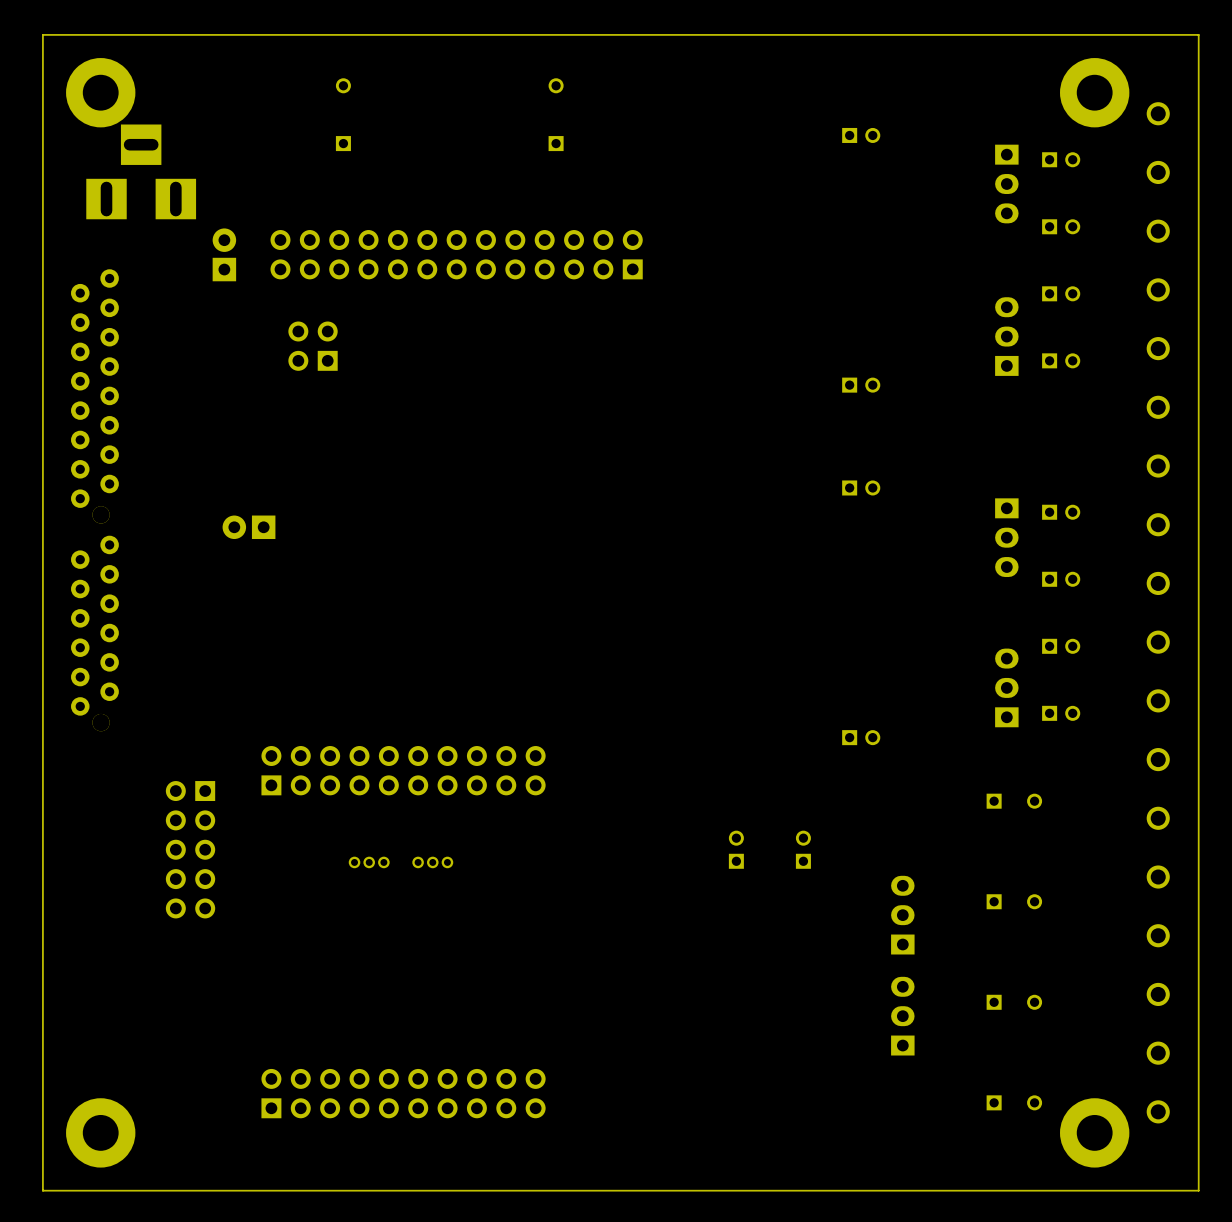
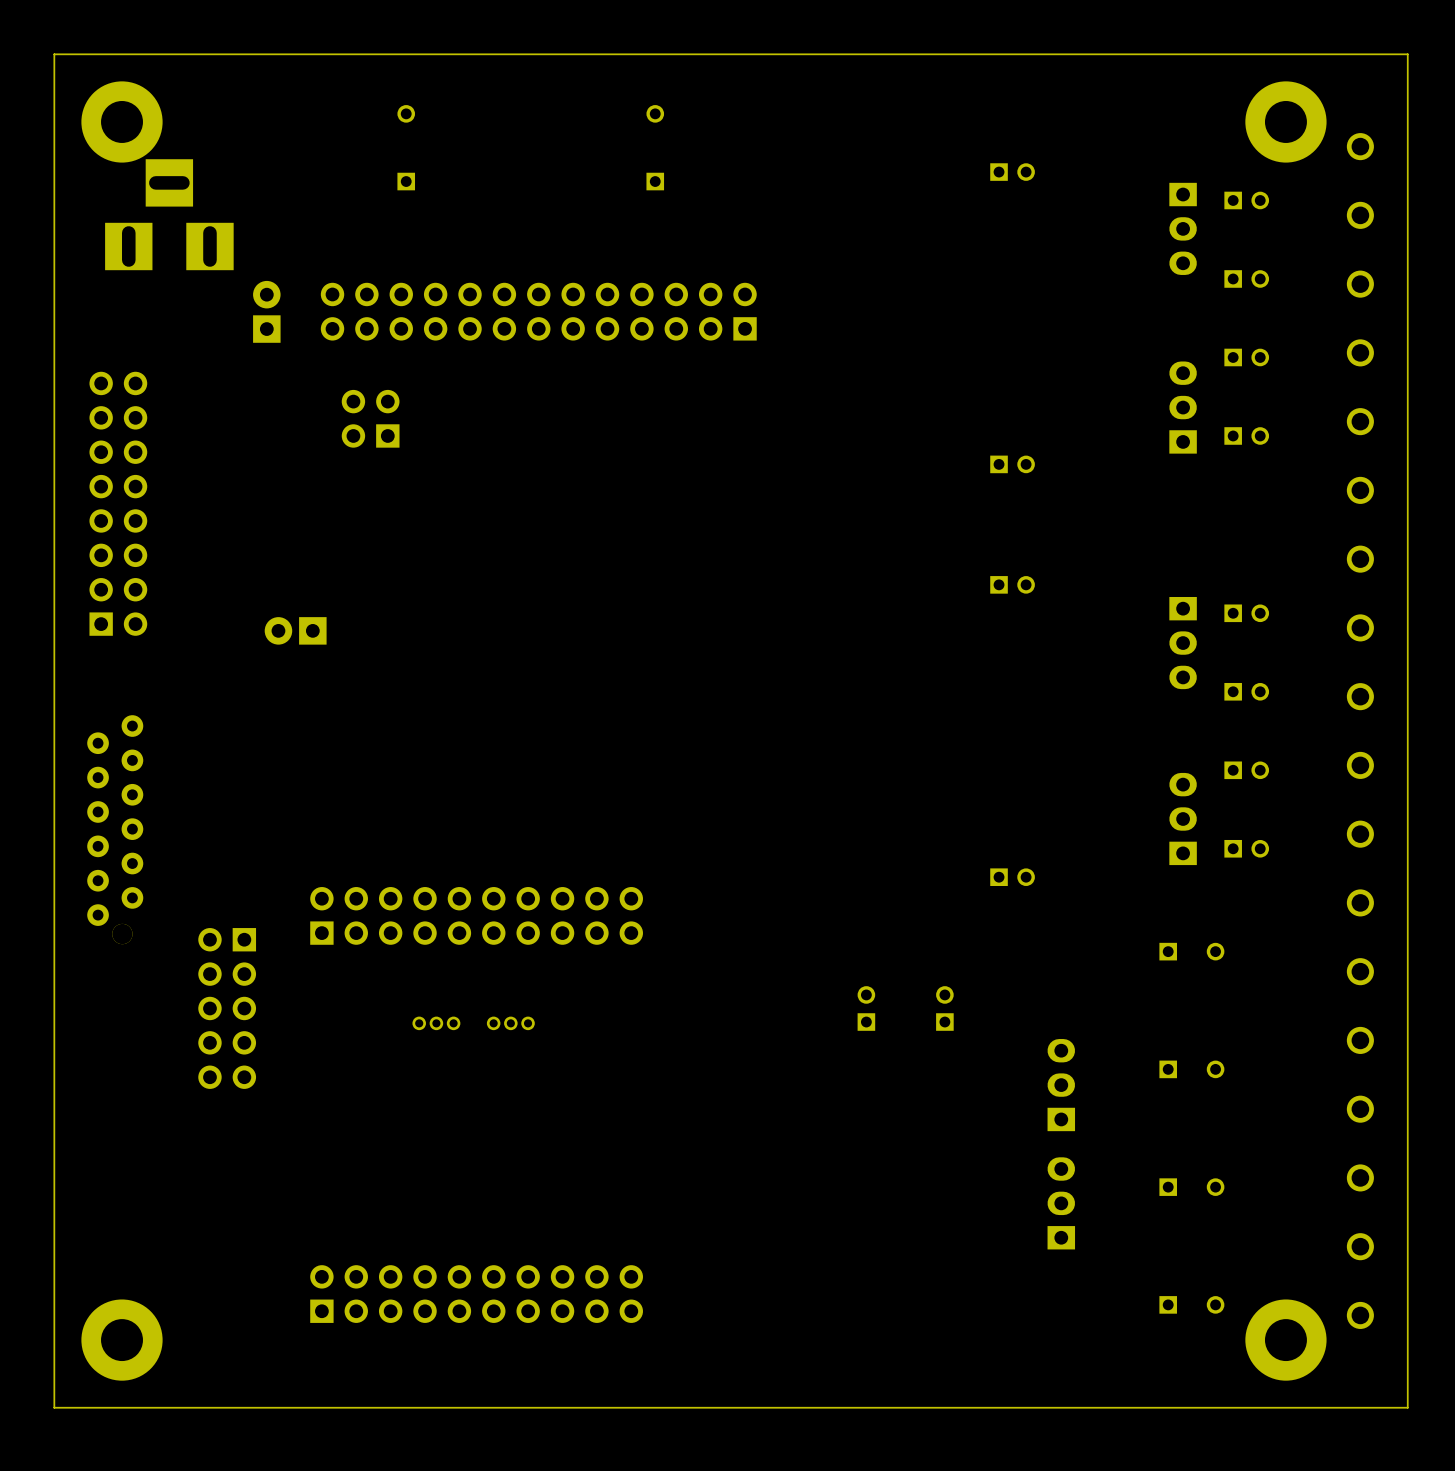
part: (94, 396) -> none
part: none -> (118, 503)
part position: (94, 633) -> (115, 829)

